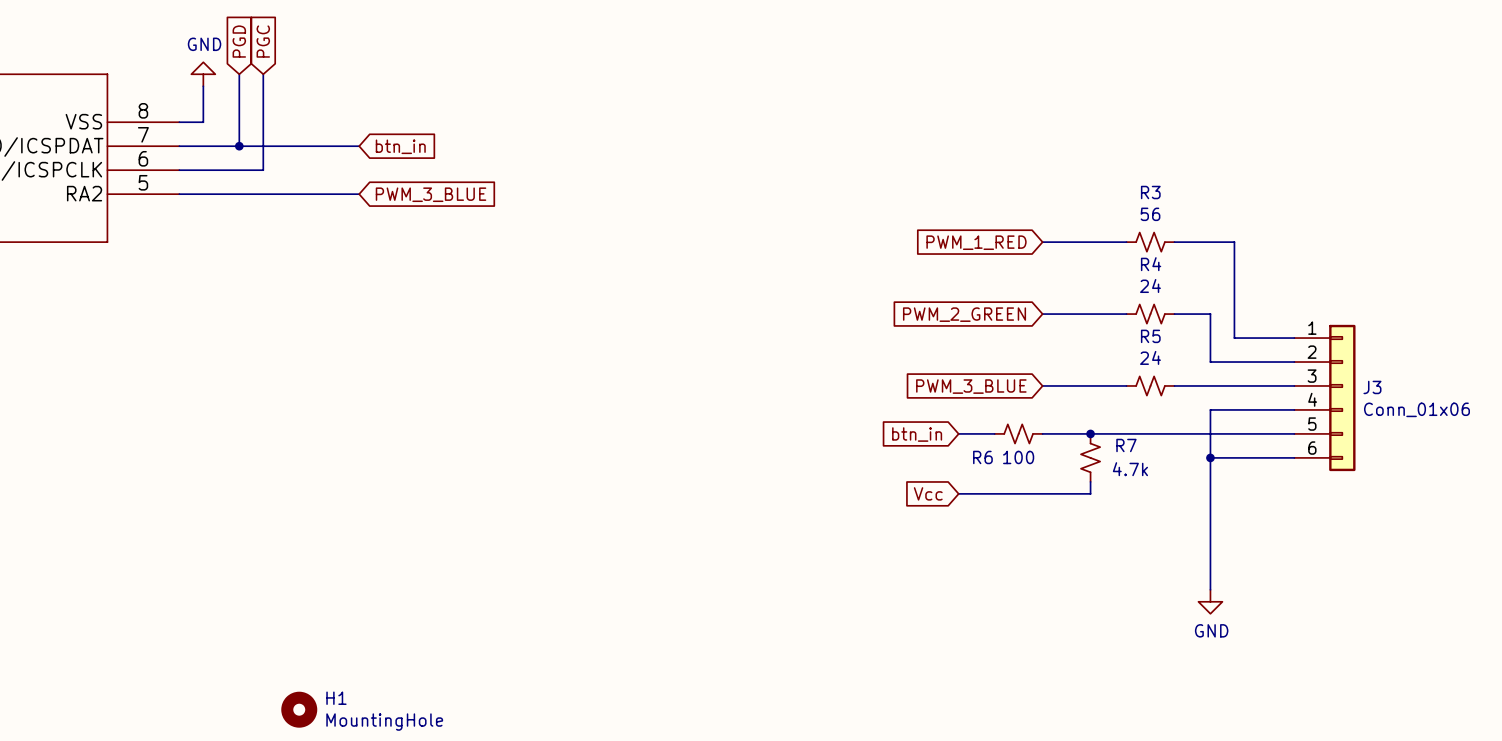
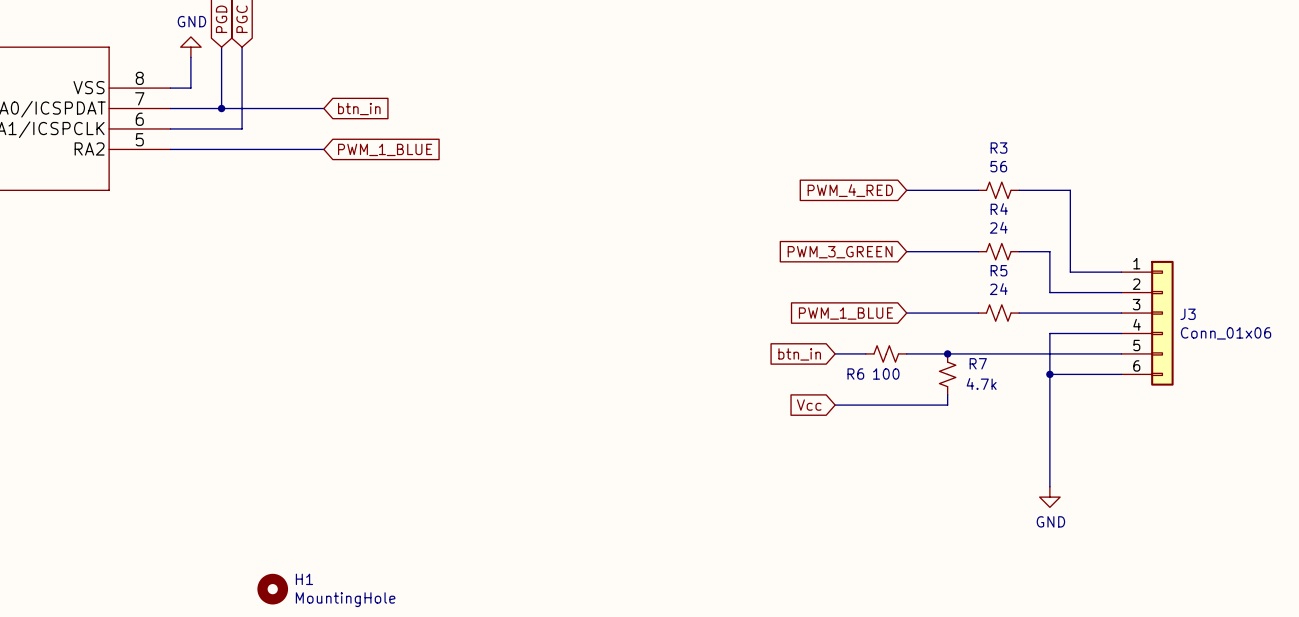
global label: PWM_3_BLUE (431, 194) -> PWM_1_BLUE (385, 149)
global label: PWM_1_RED (976, 242) -> PWM_4_RED (850, 190)
global label: PWM_2_GREEN (964, 314) -> PWM_3_GREEN (840, 252)
global label: PWM_3_BLUE (971, 386) -> PWM_1_BLUE (845, 313)

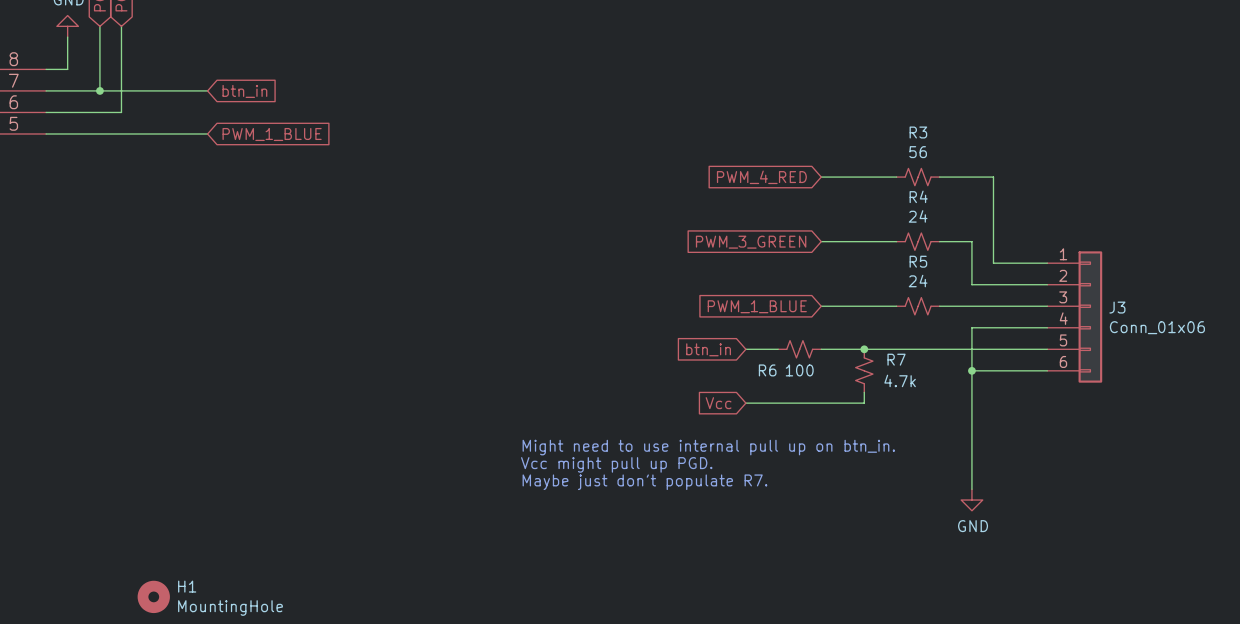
text: none -> Might need to use internal pull up on btn_in. (708, 447)
text: none -> Vcc might pull up PGD. (616, 464)
text: none -> Maybe just don't populate R7. (644, 482)

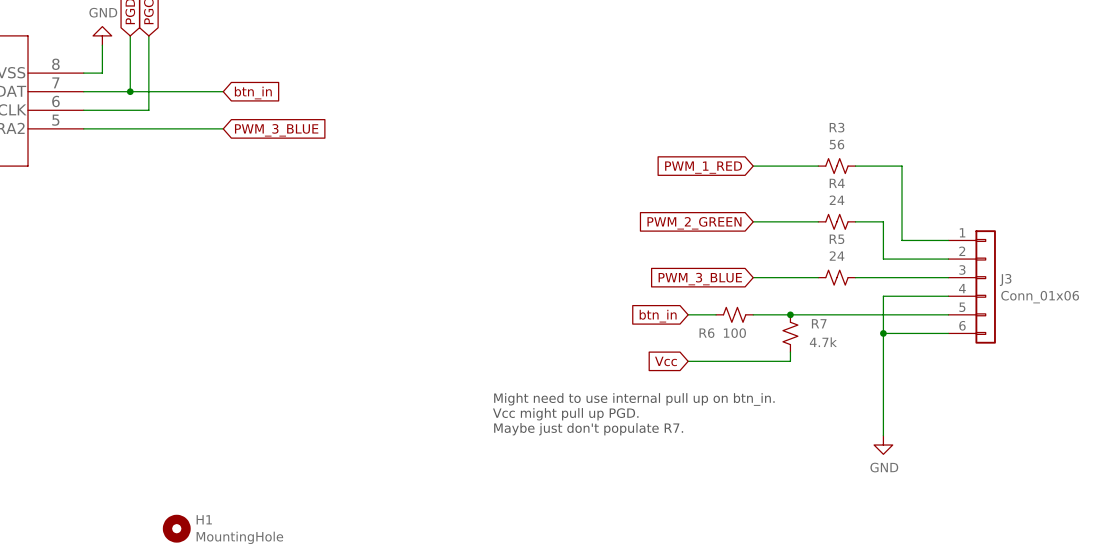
global label: PWM_1_BLUE (272, 134) -> PWM_3_BLUE (276, 130)
global label: PWM_4_RED (761, 177) -> PWM_1_RED (703, 167)
global label: PWM_3_GREEN (751, 242) -> PWM_2_GREEN (694, 223)
global label: PWM_1_BLUE (757, 306) -> PWM_3_BLUE (700, 279)

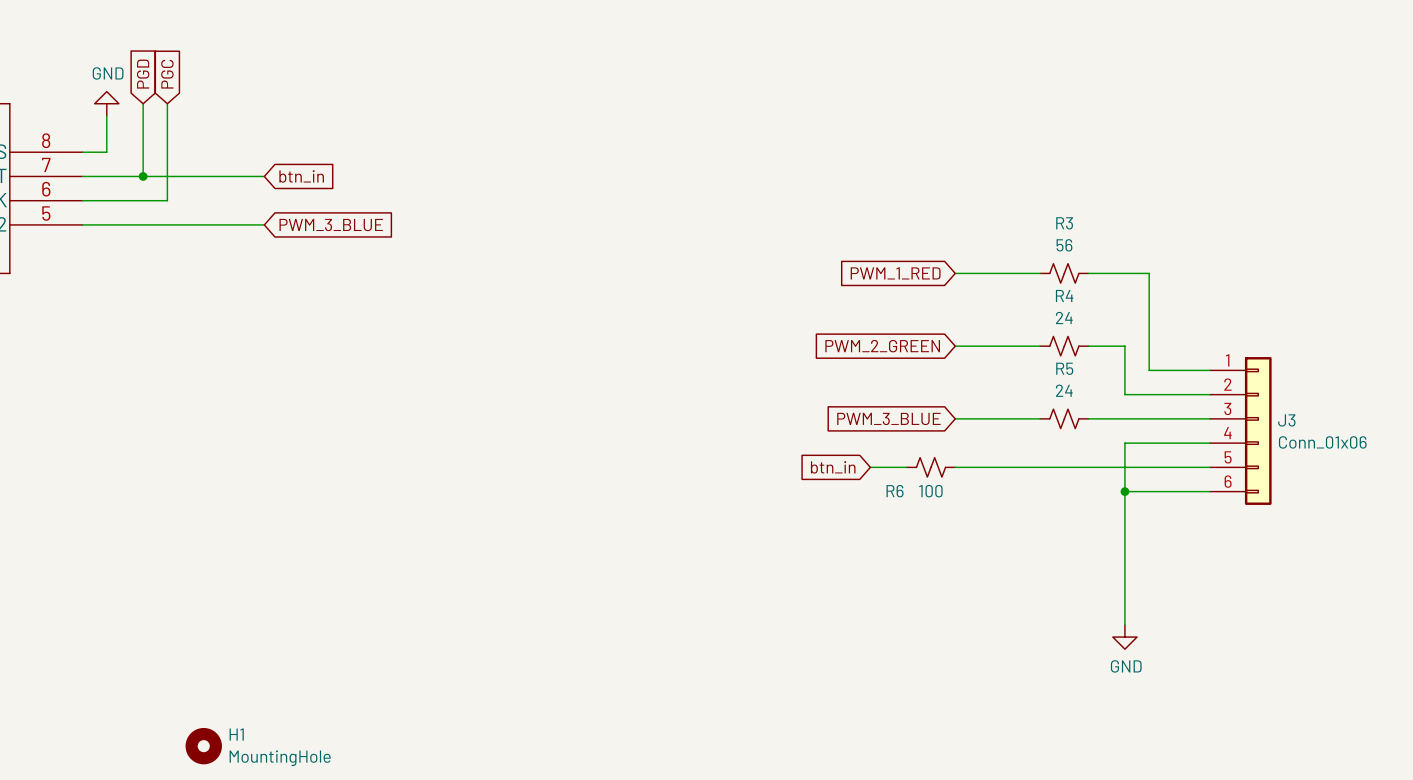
junction: (790, 314) -> none
R7: 4.7k (790, 333) -> none
wire: (790, 352) (790, 361) (688, 361) -> none
global label: Vcc (665, 361) -> none
text: Might need to use internal pull up on btn_in. (634, 399) -> none
text: Vcc might pull up PGD. (565, 414) -> none
text: Maybe just don't populate R7. (588, 429) -> none

